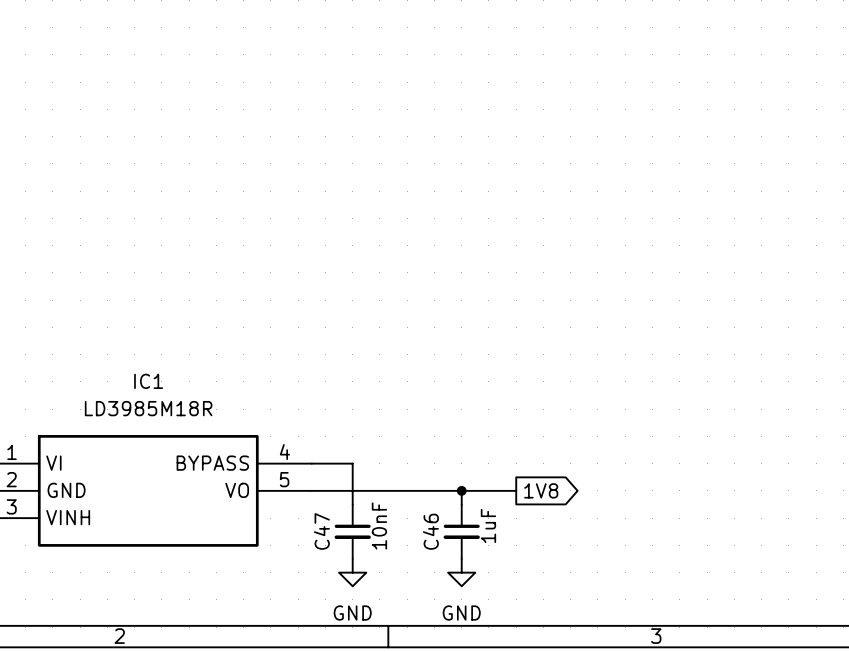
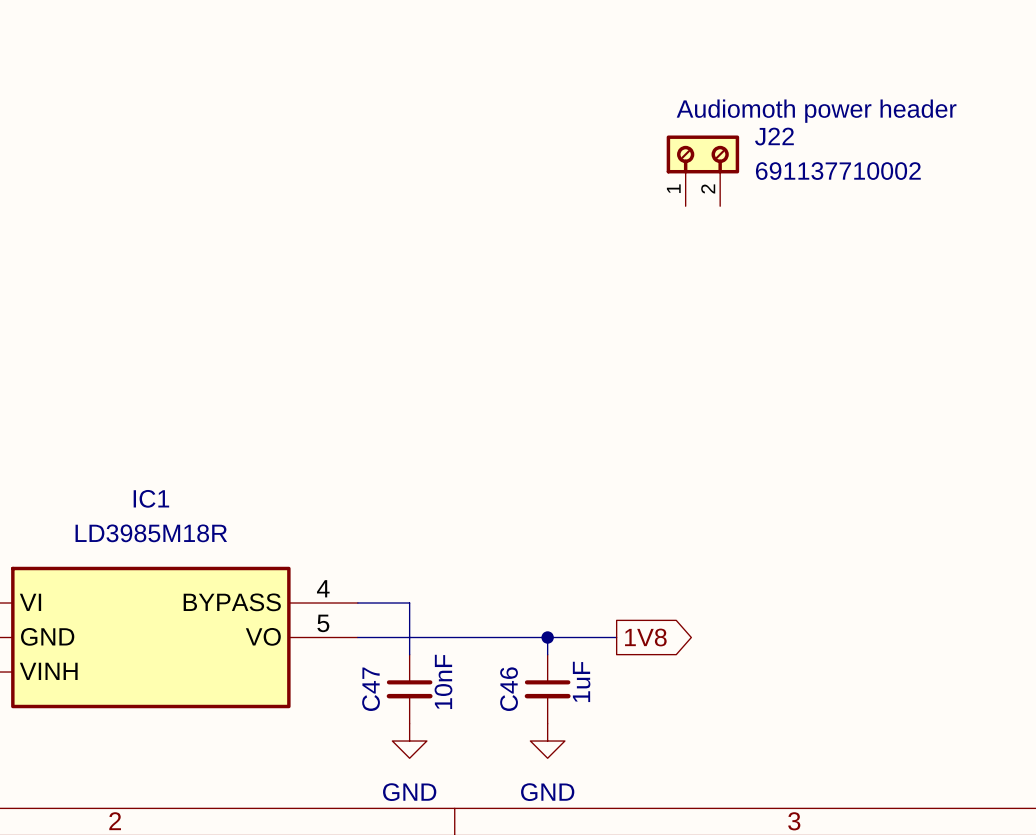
text: none -> Audiomoth power header (816, 111)
J22: none -> 691137710002 (702, 170)

